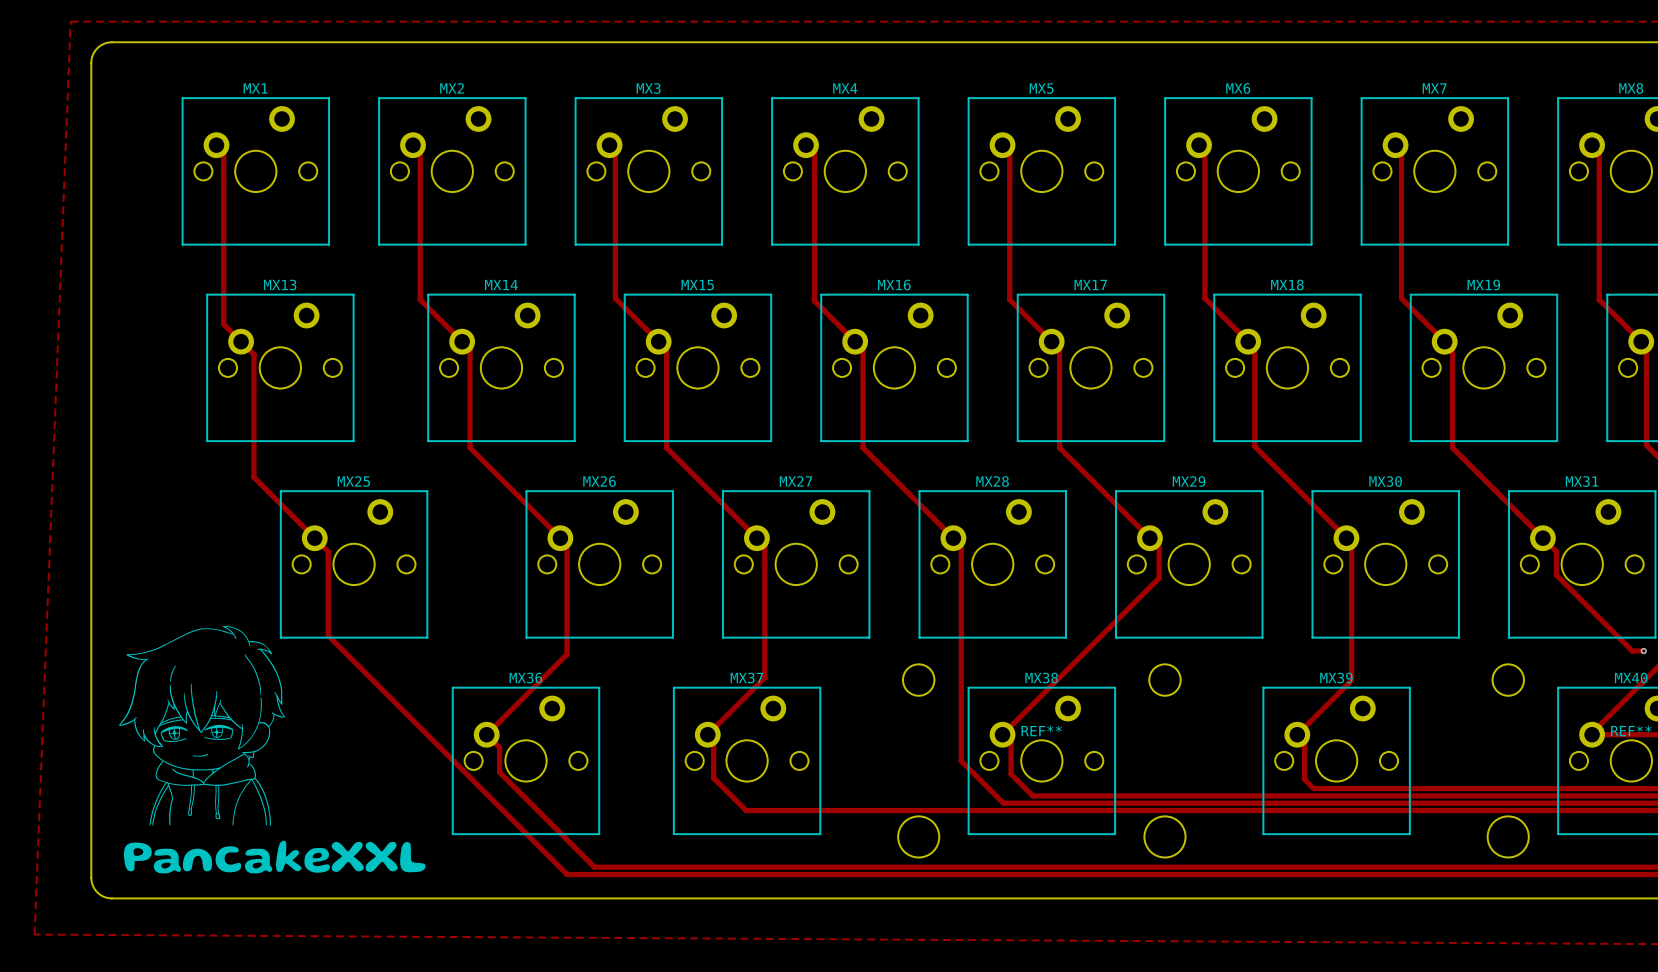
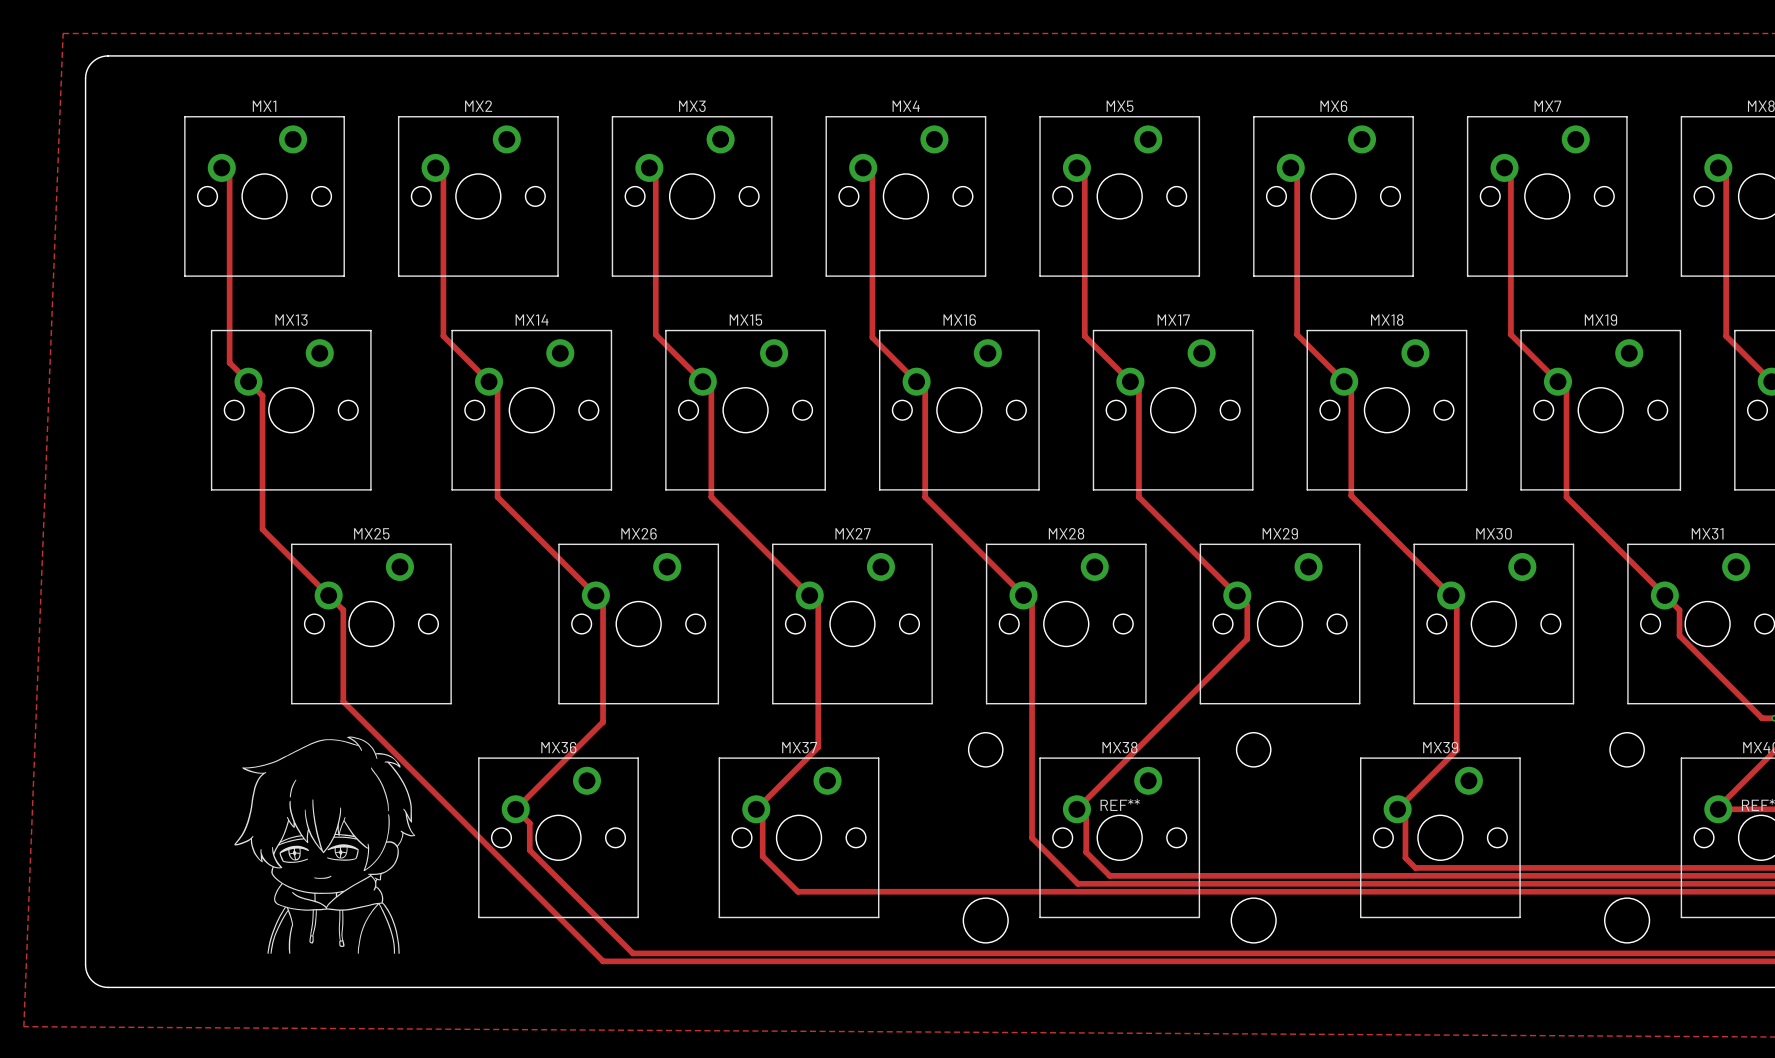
drawing position: (202, 725) -> (324, 845)
drawing: [123, 840, 426, 874] -> none

